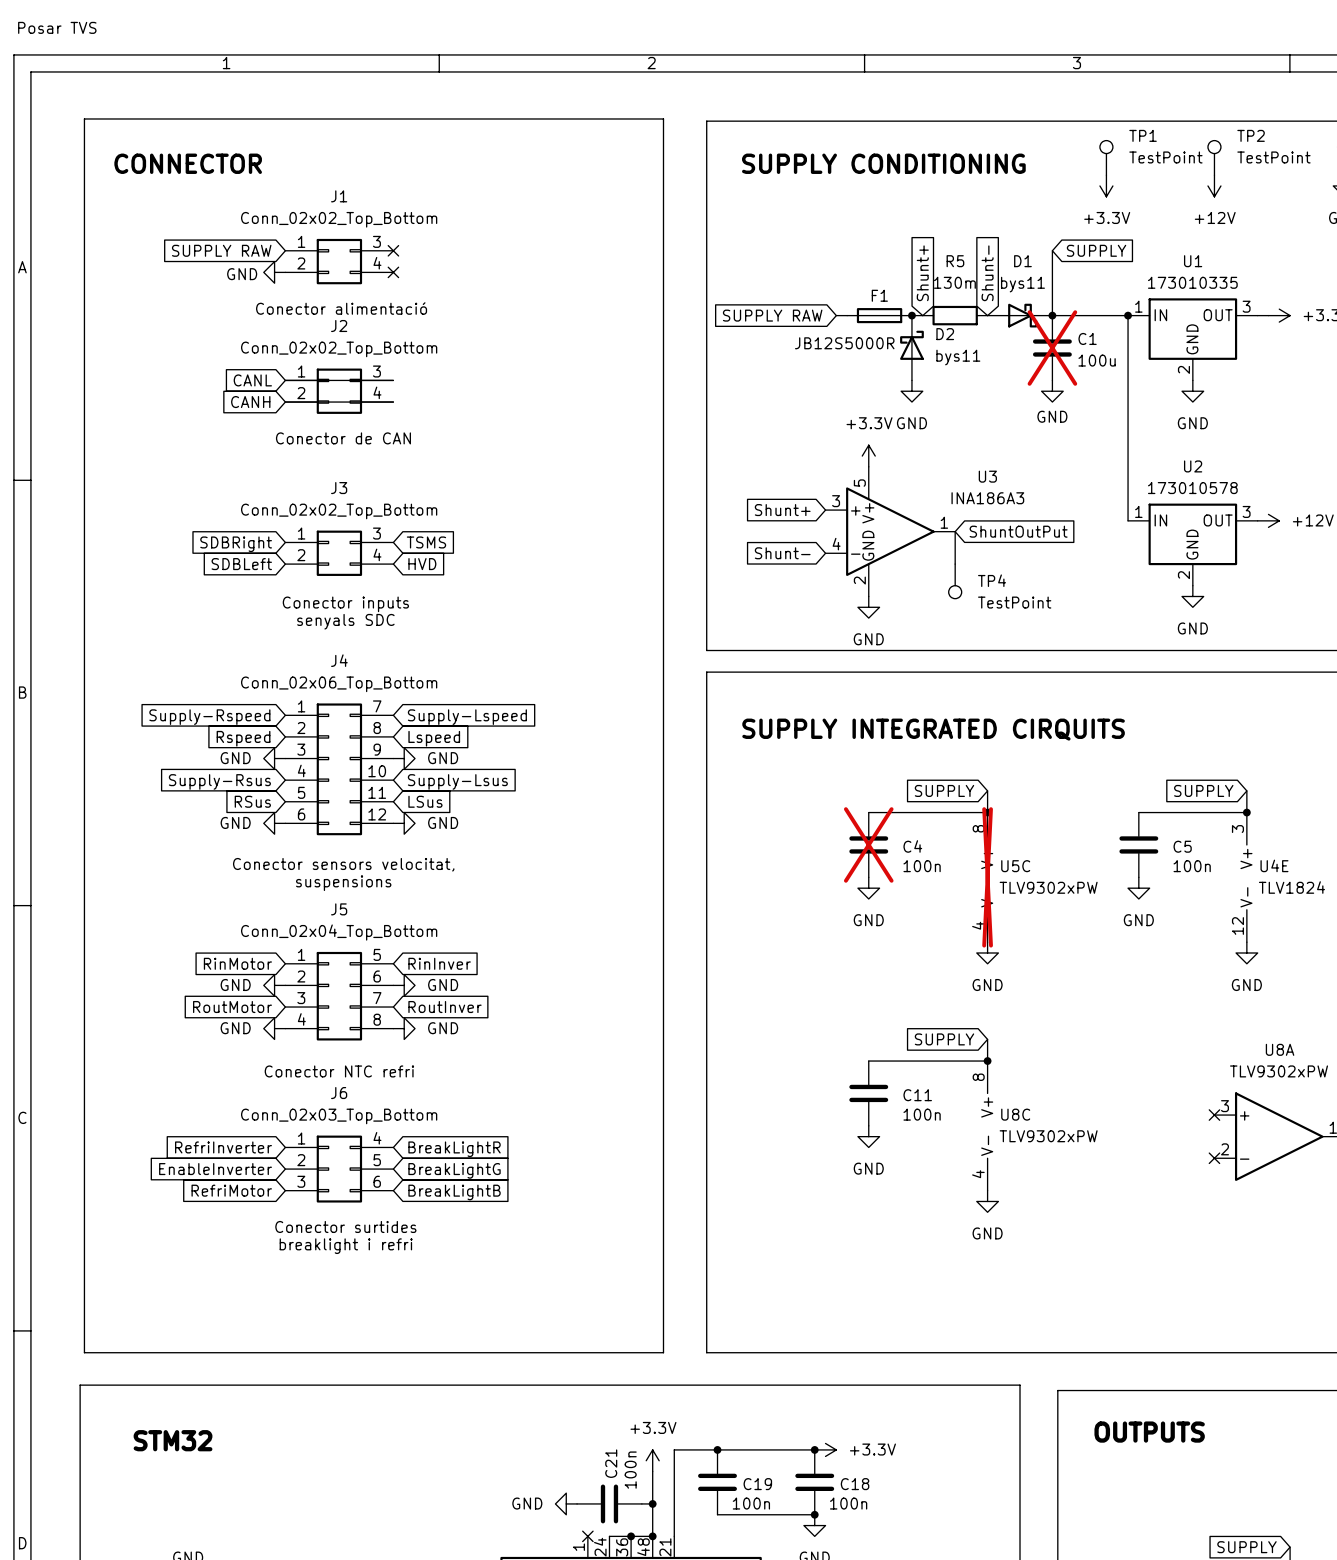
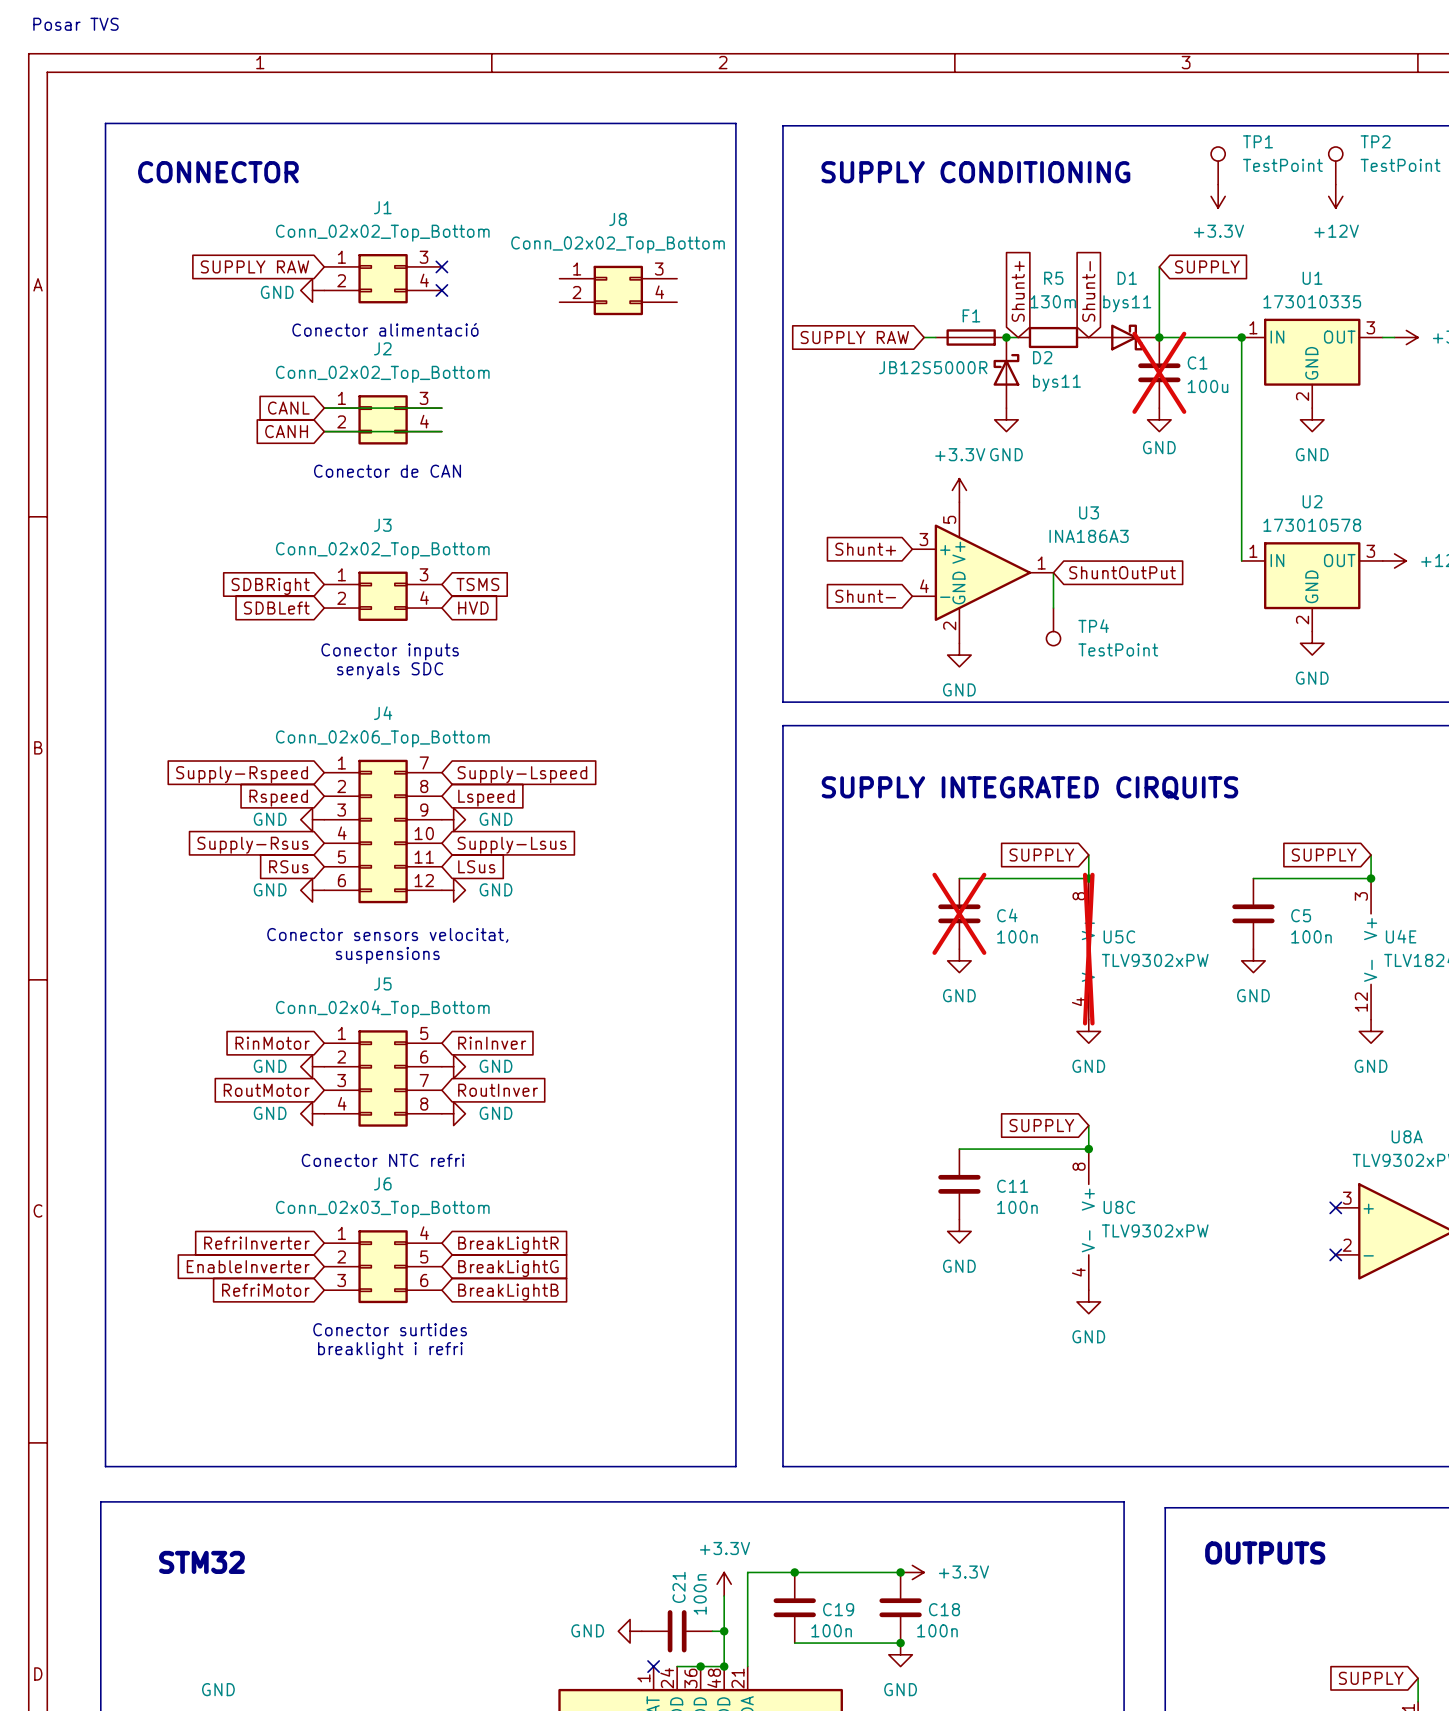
J8: none -> Conn_02x02_Top_Bottom (618, 290)

